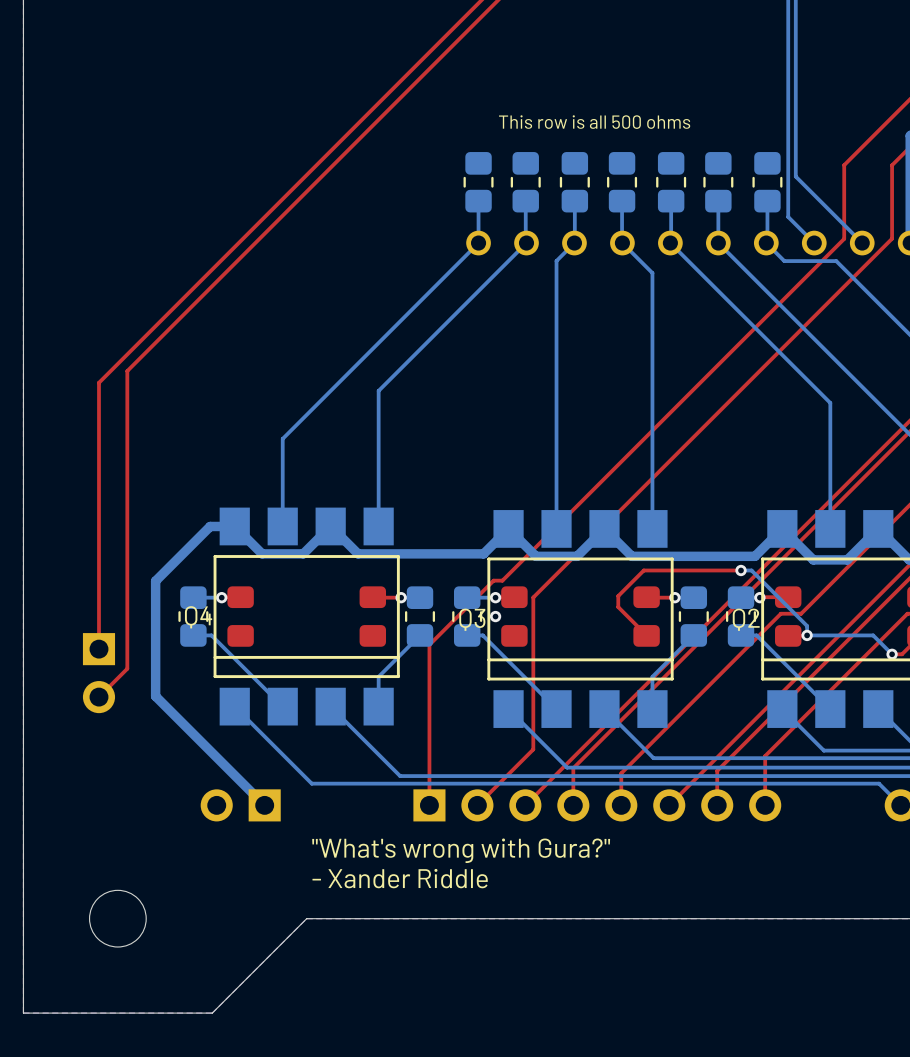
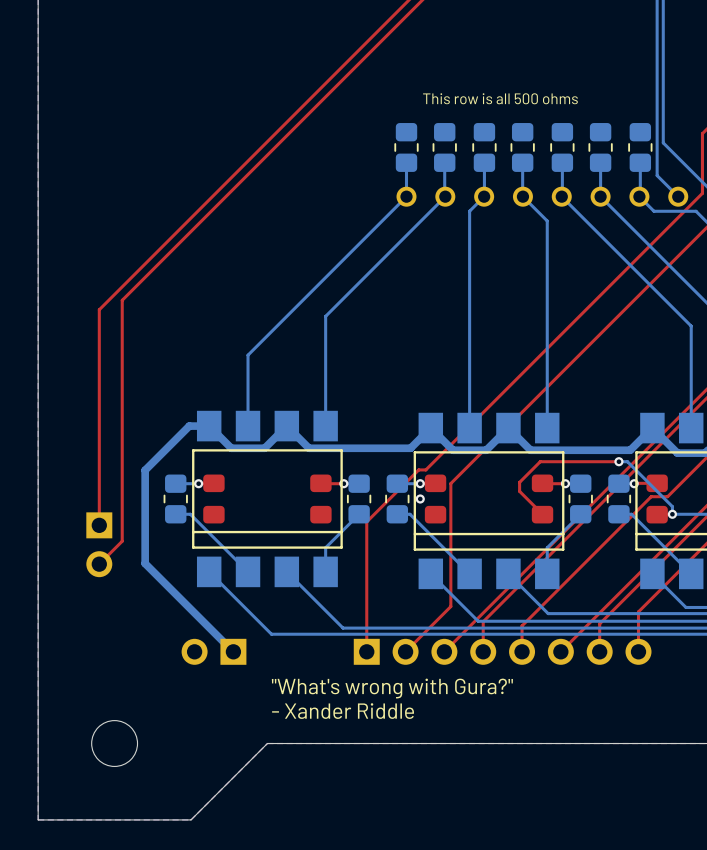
Q4 name: Q4 (198, 617) -> none
Q3 name: Q3 (472, 619) -> none
Q2 name: Q2 (746, 619) -> none

